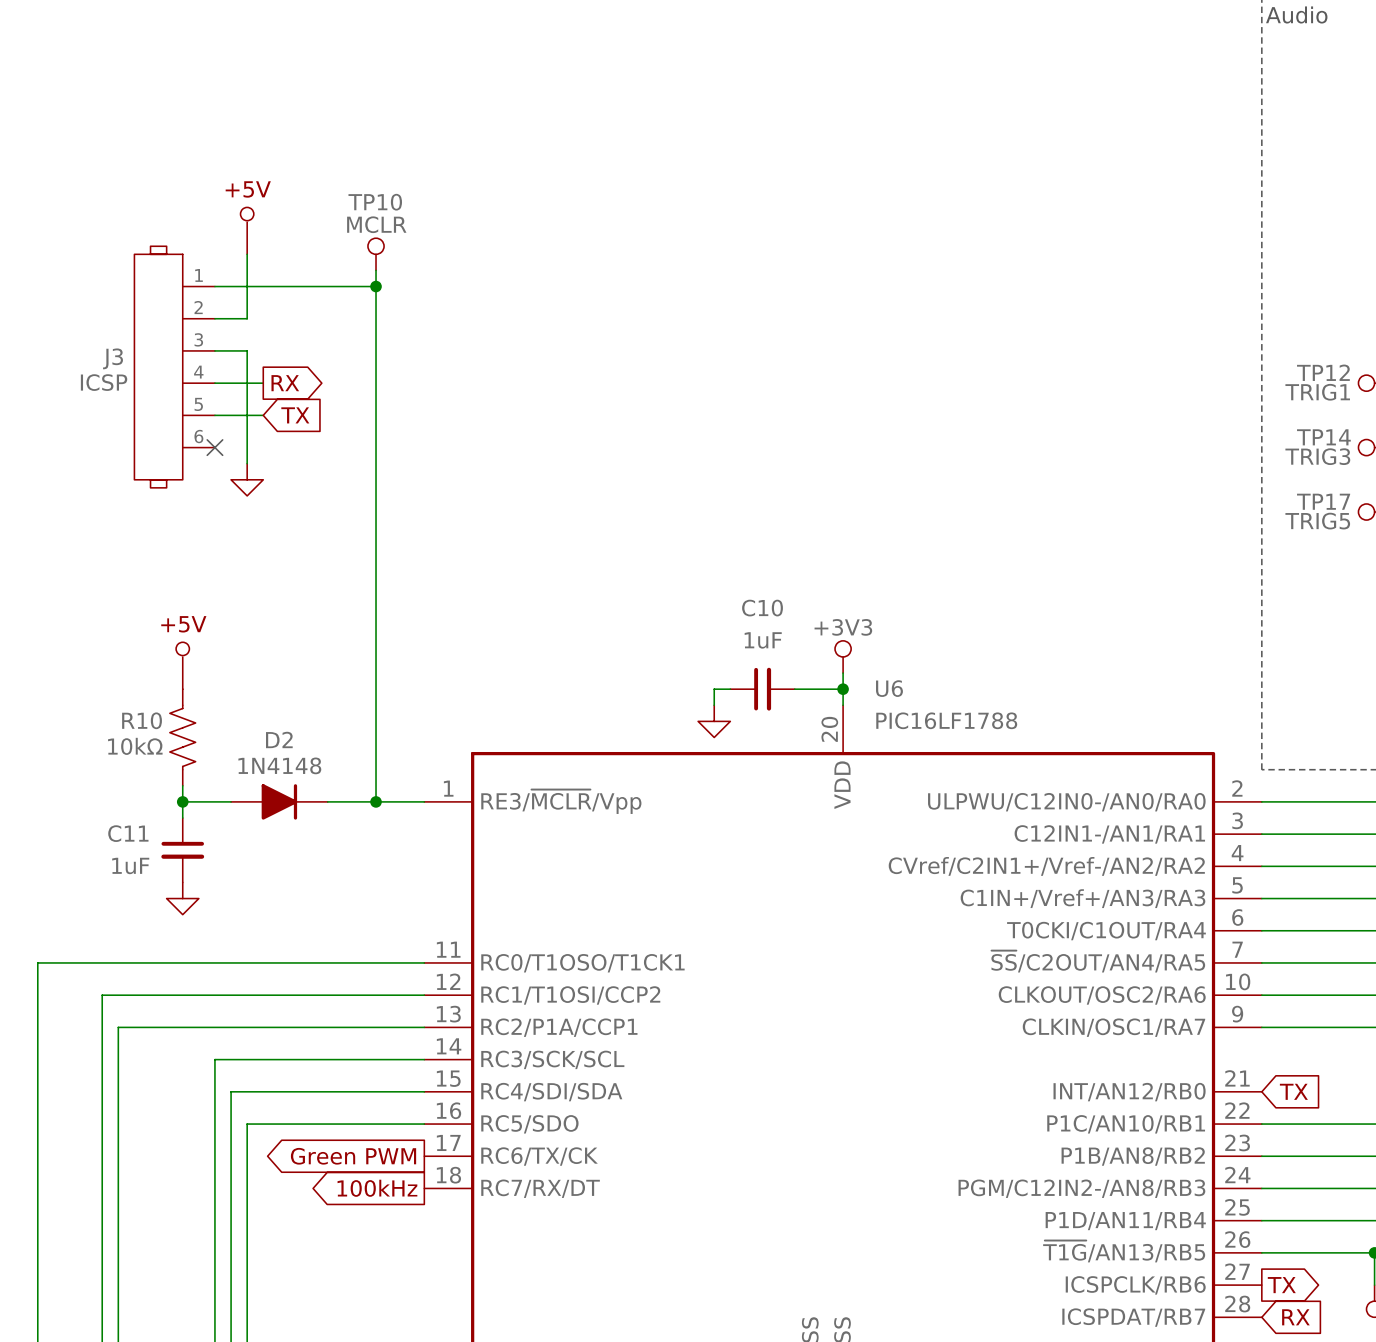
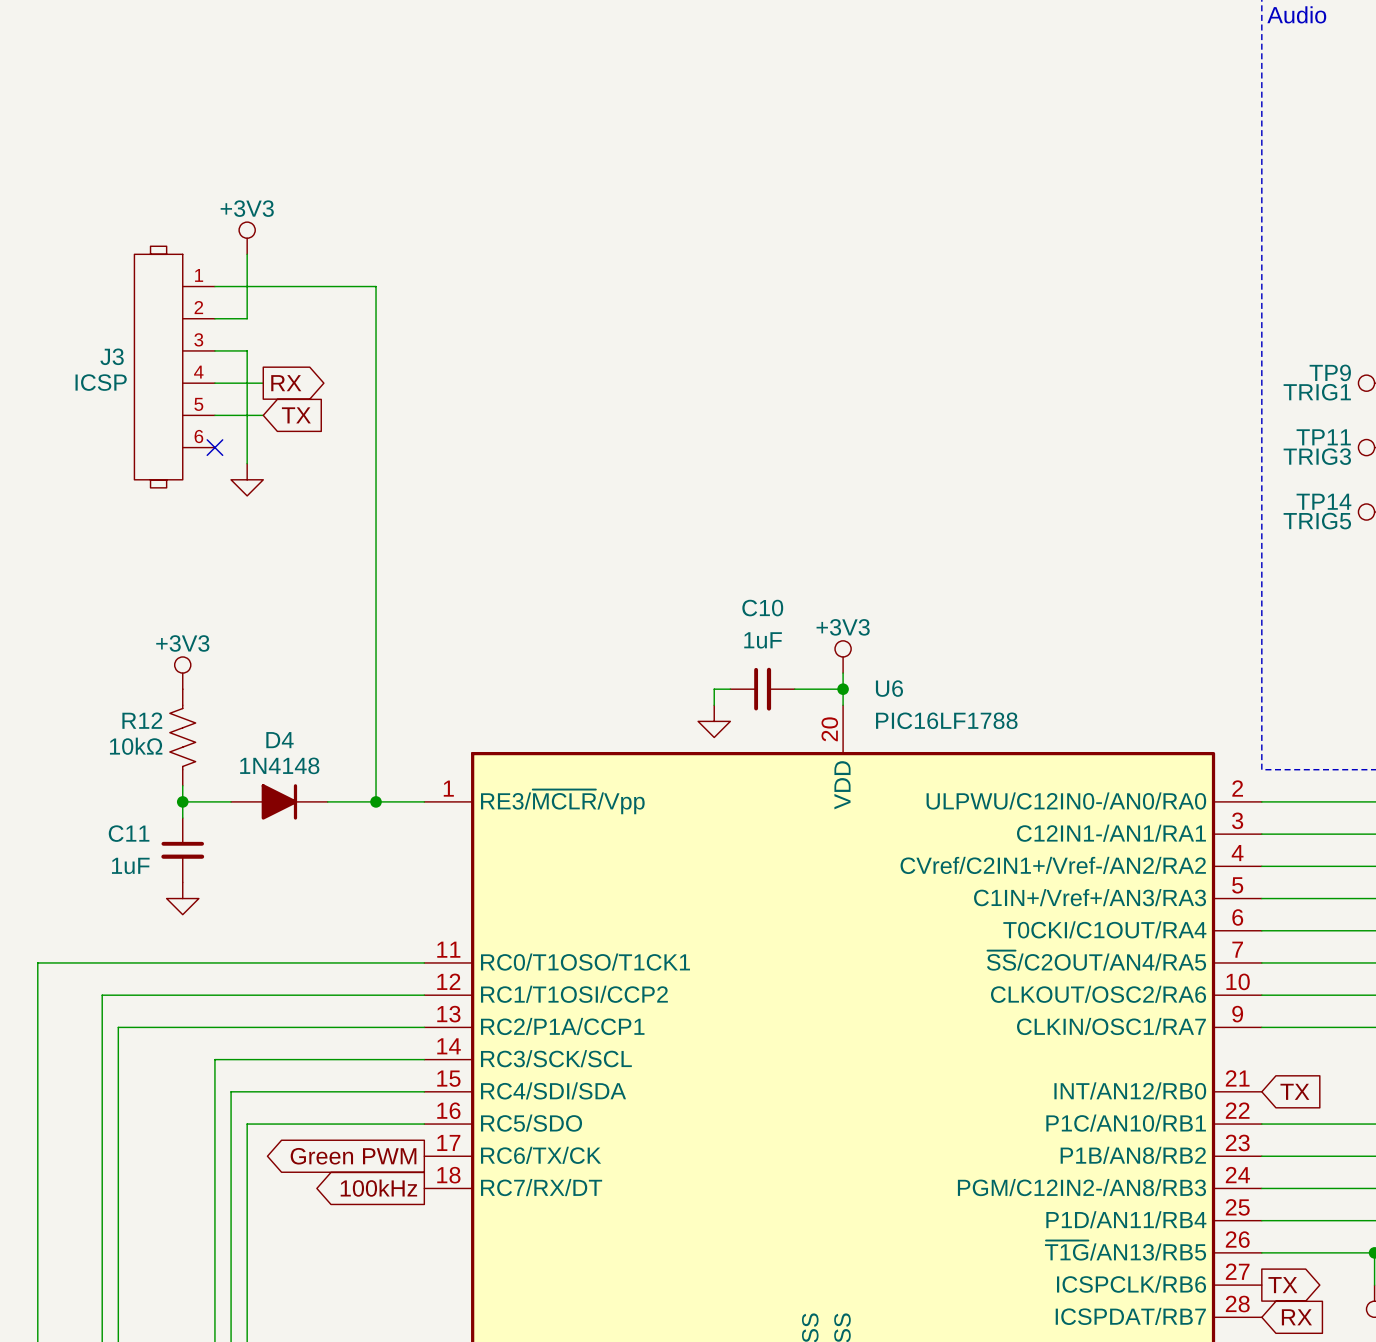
power symbol shape: [240, 207, 254, 255] -> [239, 222, 256, 255]
power symbol text: none -> +3V3 (247, 208)
TP10: MCLR (376, 254) -> none
wire: (376, 270) (376, 286) -> none
junction: (376, 286) -> none
TP12 name: TP12 (1323, 372) -> TP9 (1330, 372)
TP14 name: TP14 (1323, 437) -> TP11 (1323, 437)
TP17 name: TP17 (1323, 501) -> TP14 (1323, 501)
power symbol shape: [176, 642, 190, 690] -> [174, 656, 191, 690]
power symbol text: none -> +3V3 (182, 643)
R10 name: R10 (142, 720) -> R12 (142, 720)
D2 name: D2 (279, 739) -> D4 (279, 740)

